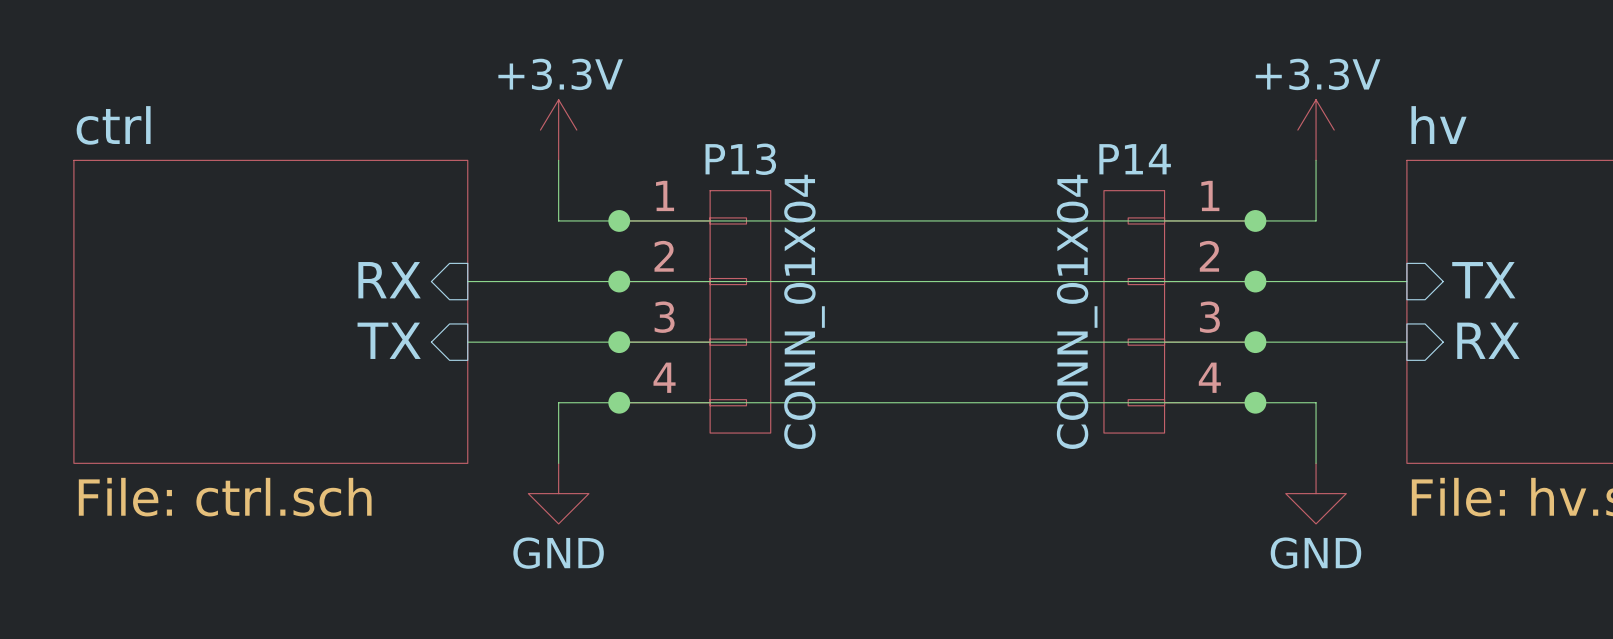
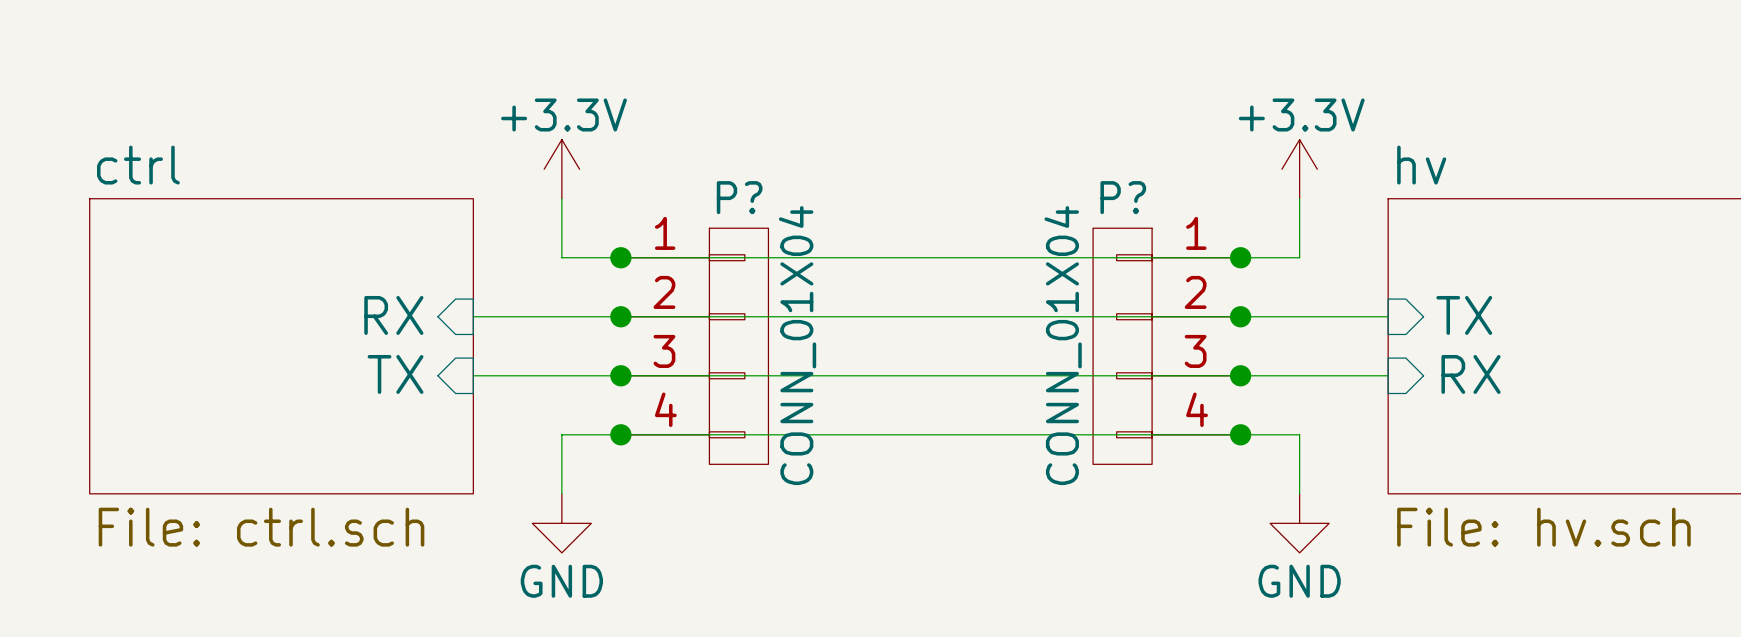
P13 name: P13 (740, 159) -> P? (739, 197)
P14 name: P14 (1135, 159) -> P? (1123, 197)

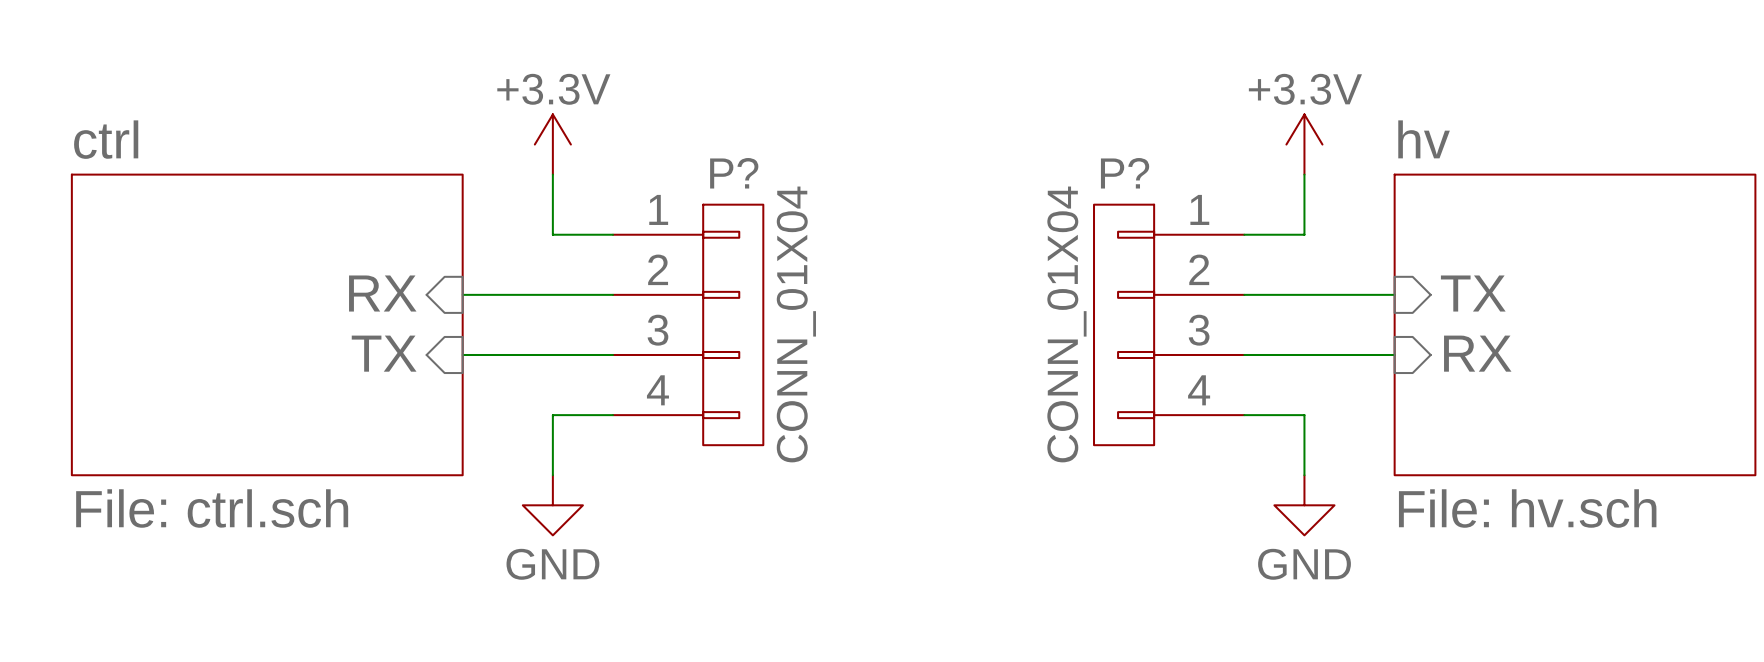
wire: (620, 257) (1240, 257) -> none
junction: (620, 257) -> none
junction: (1240, 257) -> none
wire: (620, 316) (1240, 316) -> none
junction: (620, 316) -> none
junction: (1240, 316) -> none
wire: (620, 375) (1240, 375) -> none
junction: (620, 375) -> none
junction: (1240, 375) -> none
wire: (620, 434) (1240, 434) -> none
junction: (620, 434) -> none
junction: (1240, 434) -> none

